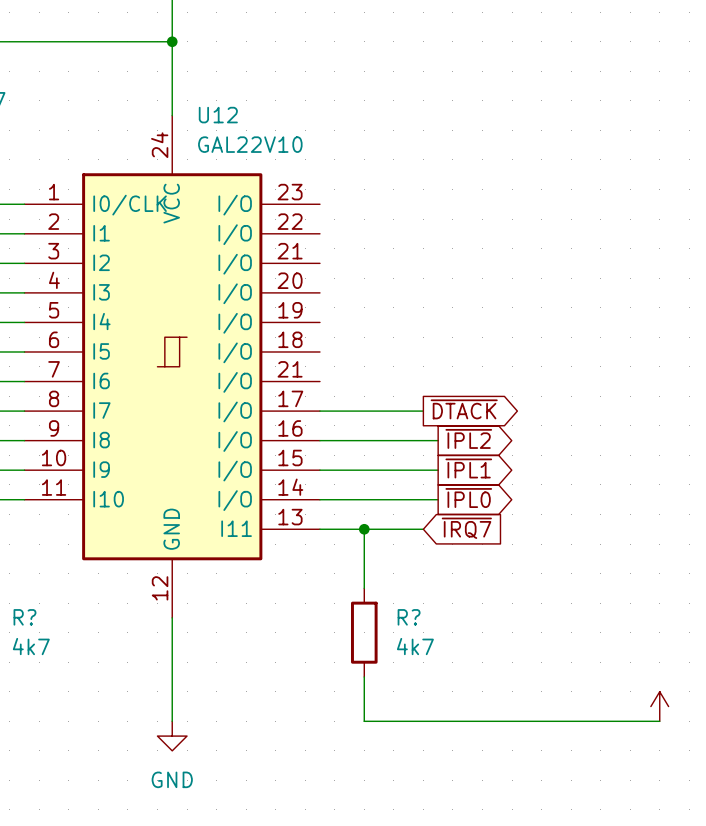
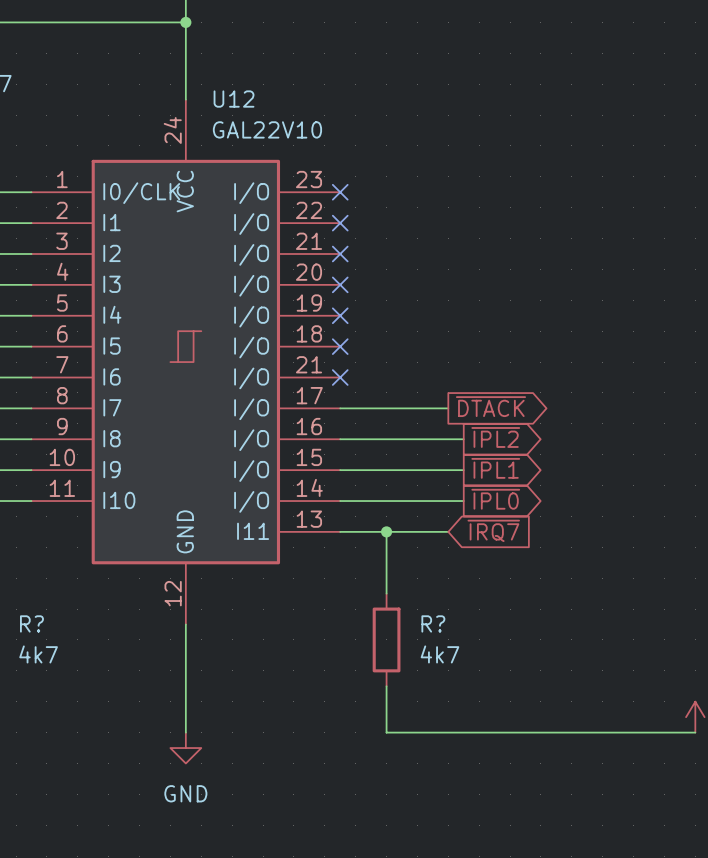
no-connect mark: none -> (340, 192)
no-connect mark: none -> (340, 223)
no-connect mark: none -> (340, 254)
no-connect mark: none -> (340, 284)
no-connect mark: none -> (340, 315)
no-connect mark: none -> (340, 346)
no-connect mark: none -> (340, 377)

